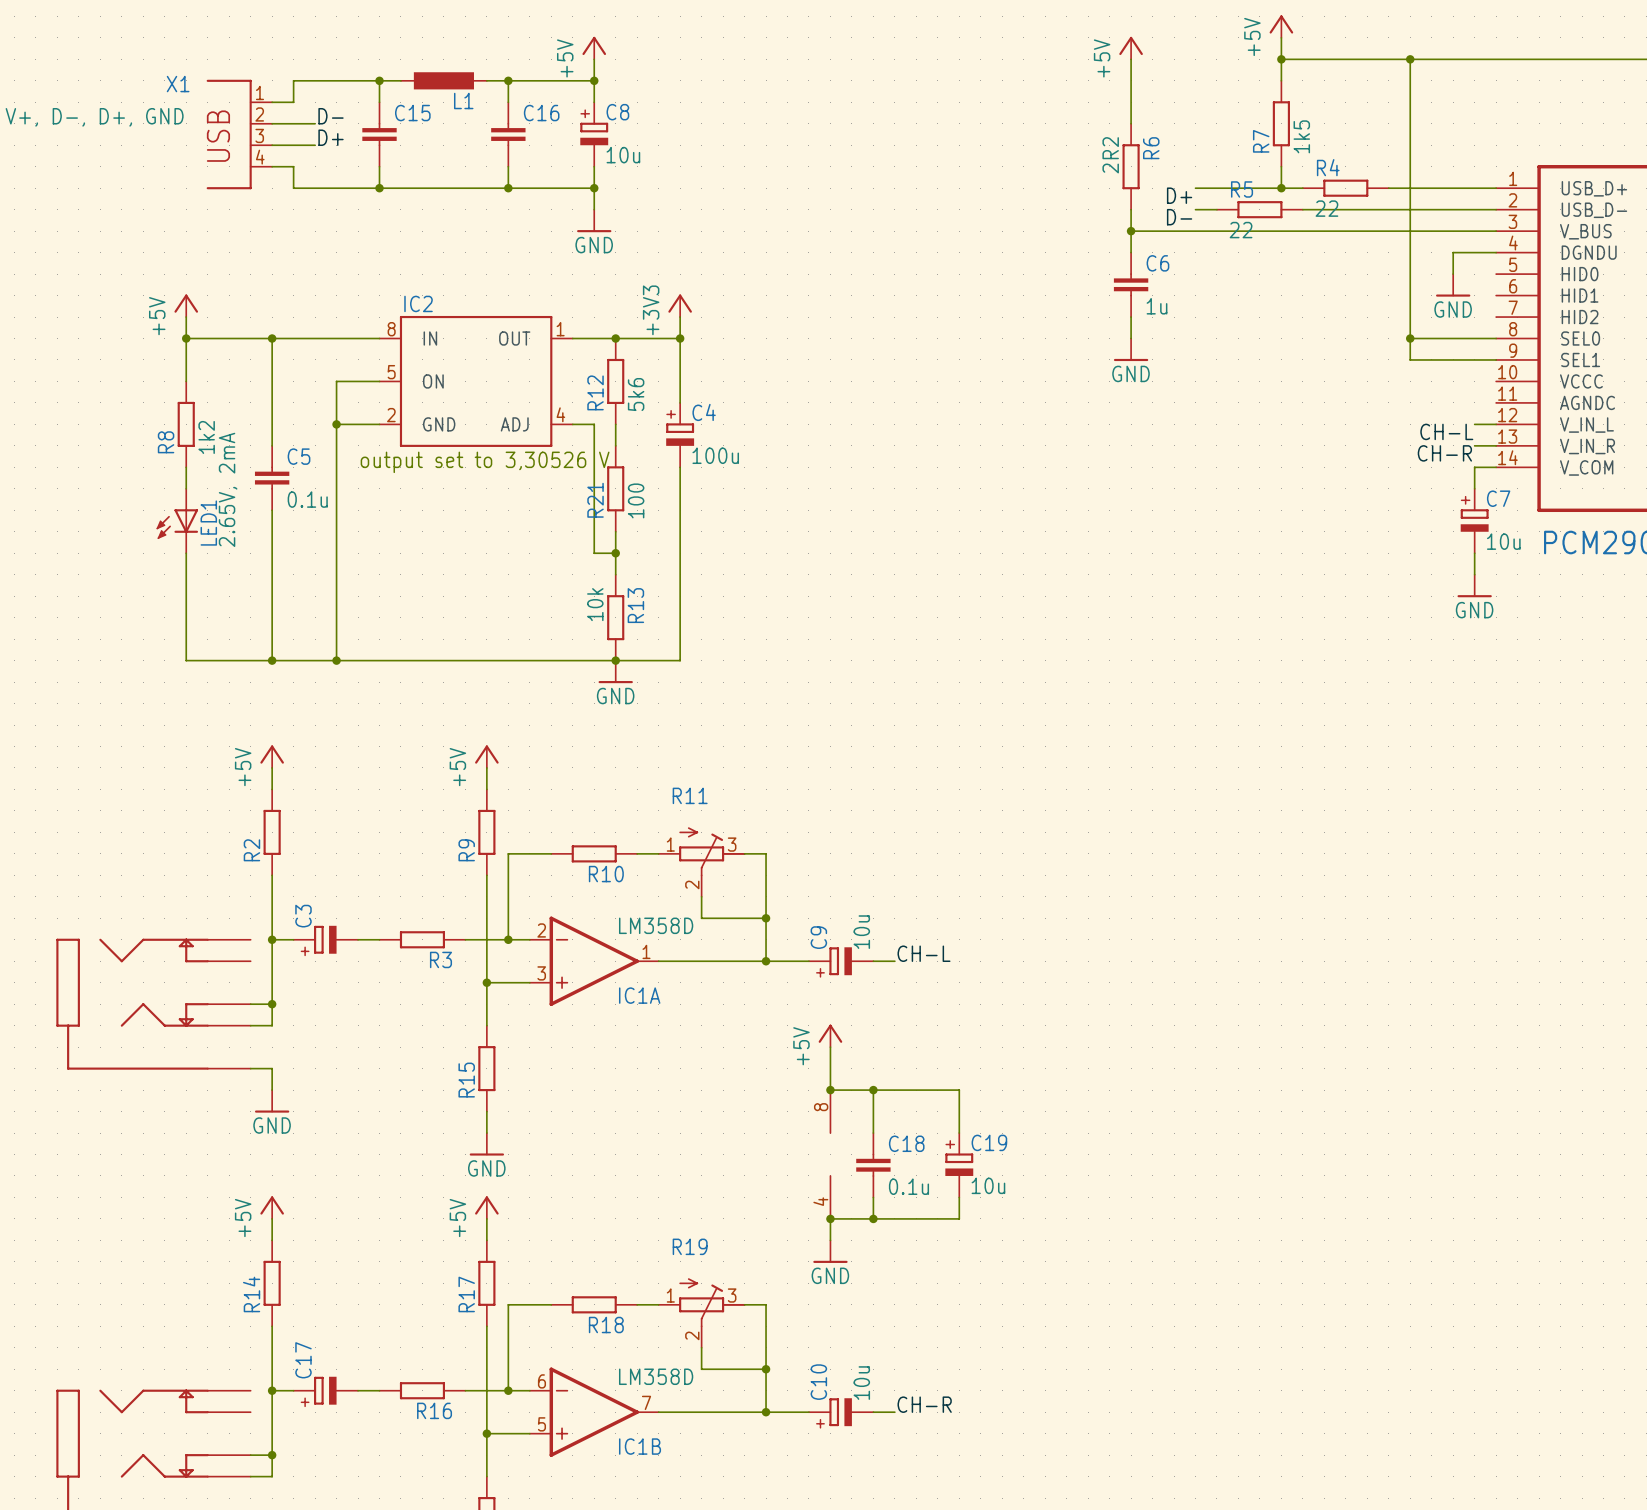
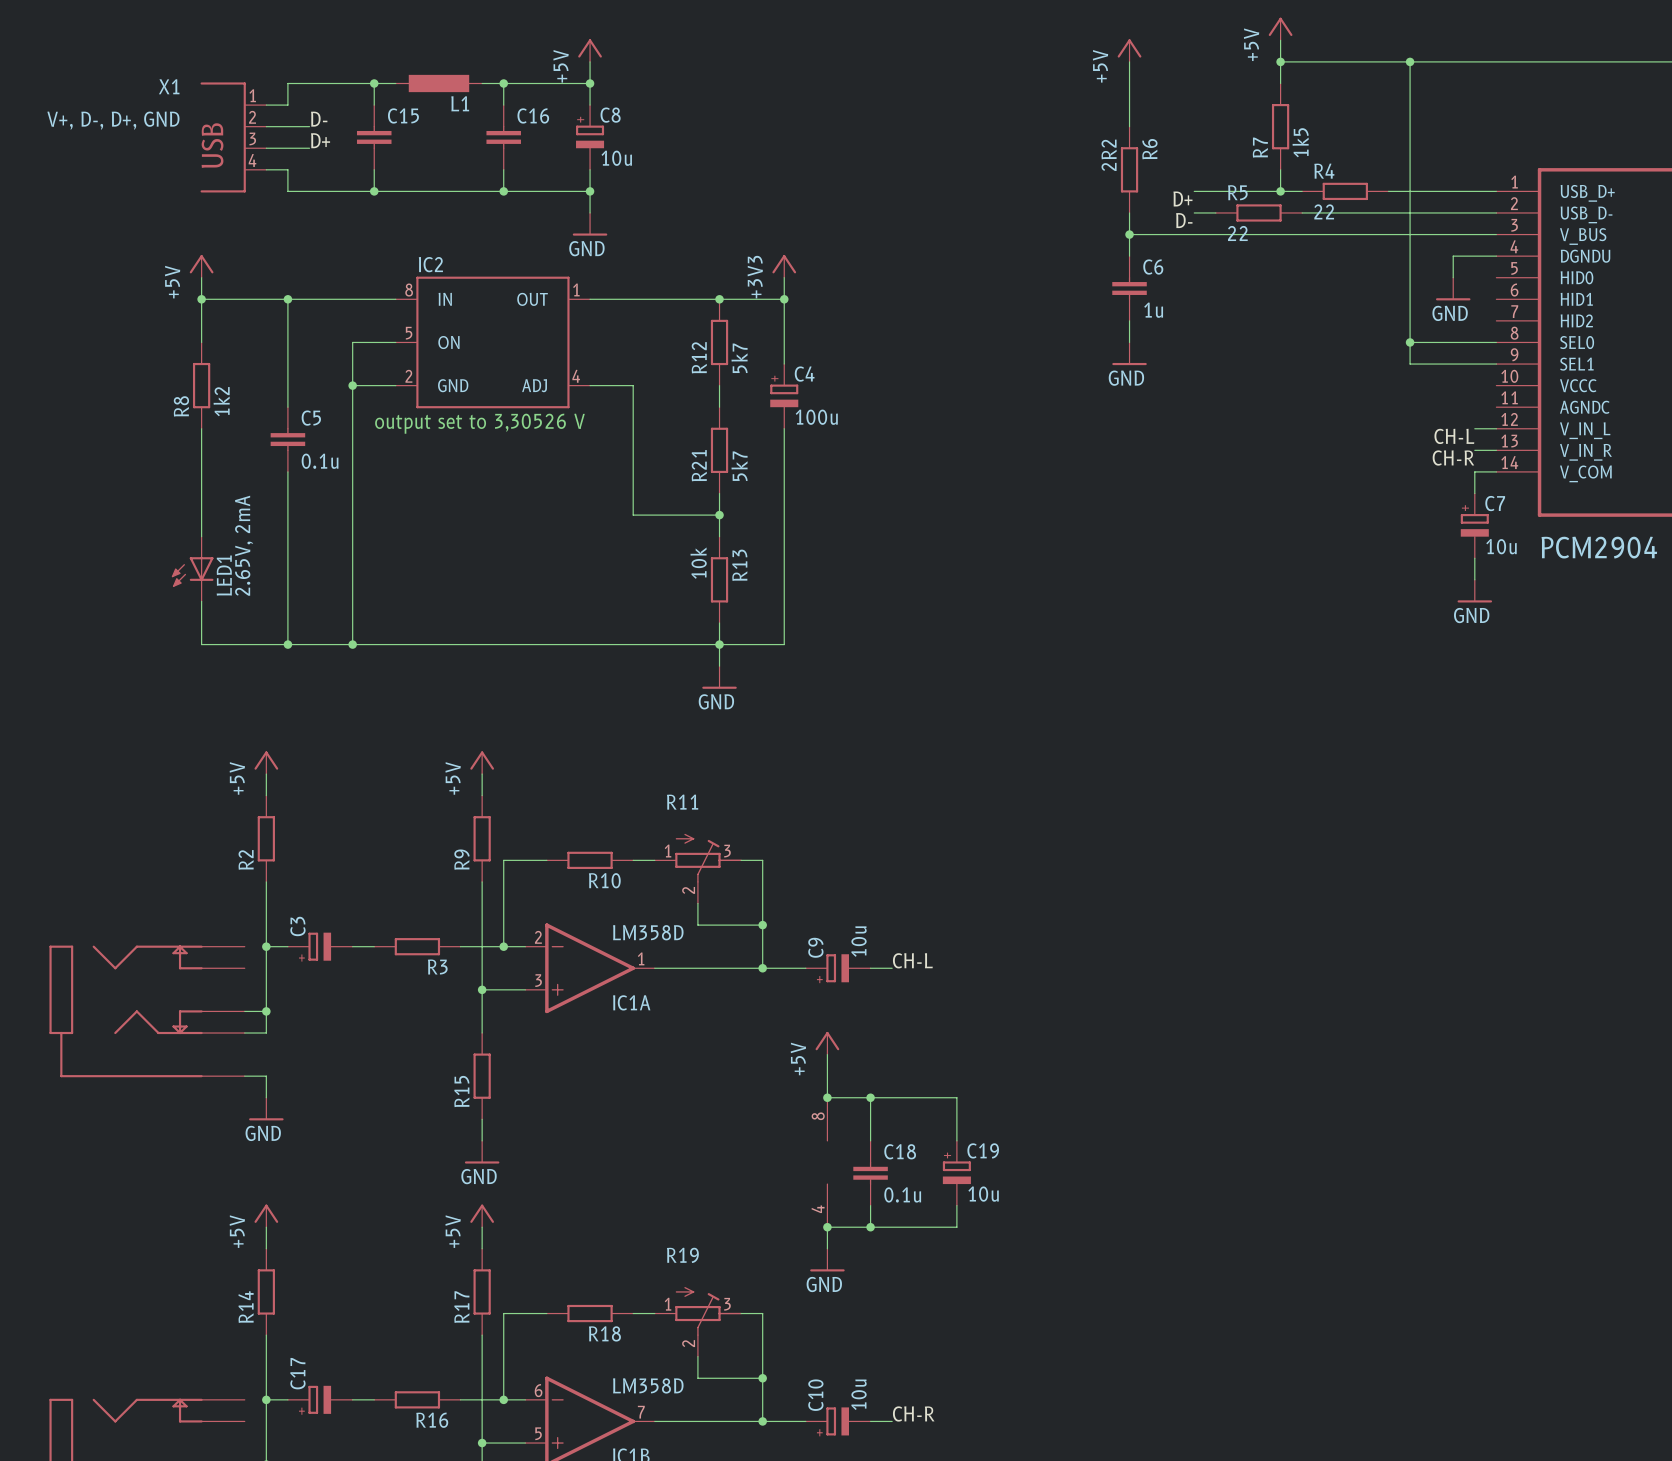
wire: none -> (201, 299) (395, 299)
junction: none -> (201, 299)
junction: none -> (287, 299)
wire: none -> (590, 299) (784, 299)
junction: none -> (719, 299)
junction: none -> (784, 299)
power symbol position: +5V (186, 305) -> +5V (201, 266)
power symbol position: +3V3 (680, 305) -> +3V3 (784, 266)
wire: (186, 317) (186, 381) -> (201, 277) (201, 342)
wire: (680, 317) (680, 402) -> (784, 277) (784, 364)
wire: (186, 338) (358, 338) -> (352, 644) (352, 342)
junction: (186, 338) -> none
wire: (272, 338) (272, 445) -> (287, 299) (287, 407)
junction: (272, 338) -> none
wire: (572, 338) (680, 338) -> none
junction: (615, 338) -> none
junction: (680, 338) -> none
wire: (358, 381) (336, 381) (336, 660) -> none
junction: none -> (352, 385)
IC2 position: (476, 381) -> (492, 342)
wire: none -> (590, 385) (633, 385) (633, 515) (719, 515)
R12 position: (615, 381) -> (719, 342)
R12 value: 5k6 (636, 394) -> 5k7 (739, 358)
R8 position: (186, 424) -> (201, 385)
wire: none -> (201, 428) (201, 536)
wire: (336, 424) (379, 424) -> none
junction: (336, 424) -> none
wire: (572, 424) (594, 424) (594, 553) (615, 553) -> none
wire: (615, 424) (615, 445) -> (719, 385) (719, 407)
wire: none -> (784, 428) (784, 644) (201, 644) (201, 601)
C4 position: (680, 435) -> (784, 396)
text position: output set to 3,30526 V (485, 462) -> output set to 3,30526 V (479, 423)
wire: (186, 467) (186, 488) -> none
wire: none -> (287, 471) (287, 644)
wire: (680, 467) (680, 660) (186, 660) (186, 553) -> none
C5 position: (272, 478) -> (287, 439)
R21 position: (615, 488) -> (719, 450)
R21 value: 100 (636, 500) -> 5k7 (739, 466)
wire: (272, 510) (272, 660) -> none
junction: none -> (719, 515)
LED1 position: (177, 521) -> (192, 569)
wire: (615, 531) (615, 574) -> (719, 493) (719, 536)
junction: (615, 553) -> none
R13 position: (615, 617) -> (719, 579)
wire: none -> (719, 622) (719, 666)
junction: none -> (287, 644)
junction: none -> (352, 644)
junction: none -> (719, 644)
junction: (272, 660) -> none
junction: (336, 660) -> none
junction: (615, 660) -> none
power symbol position: GND (615, 671) -> GND (719, 677)

